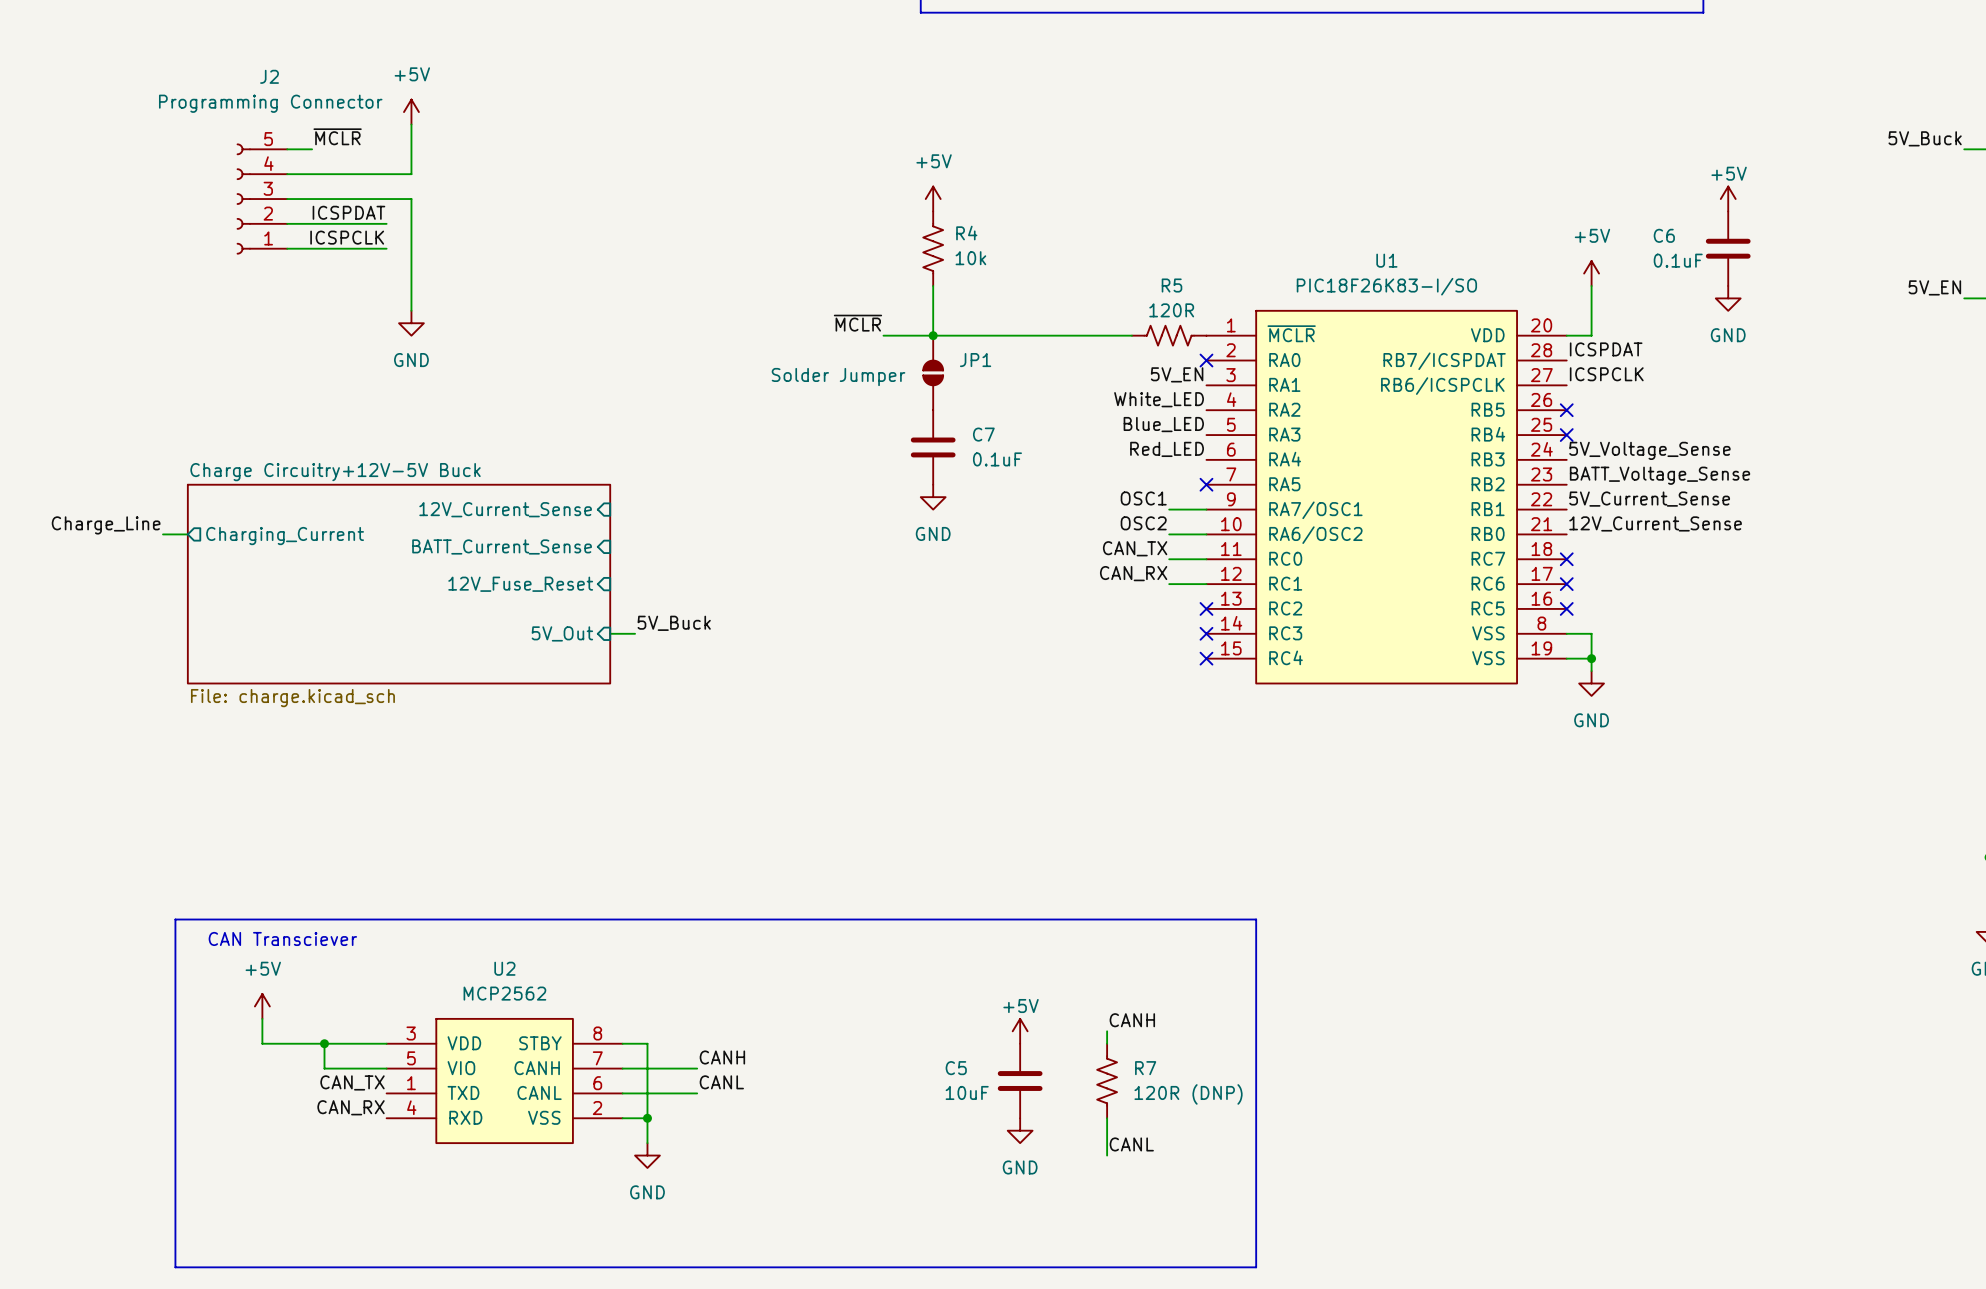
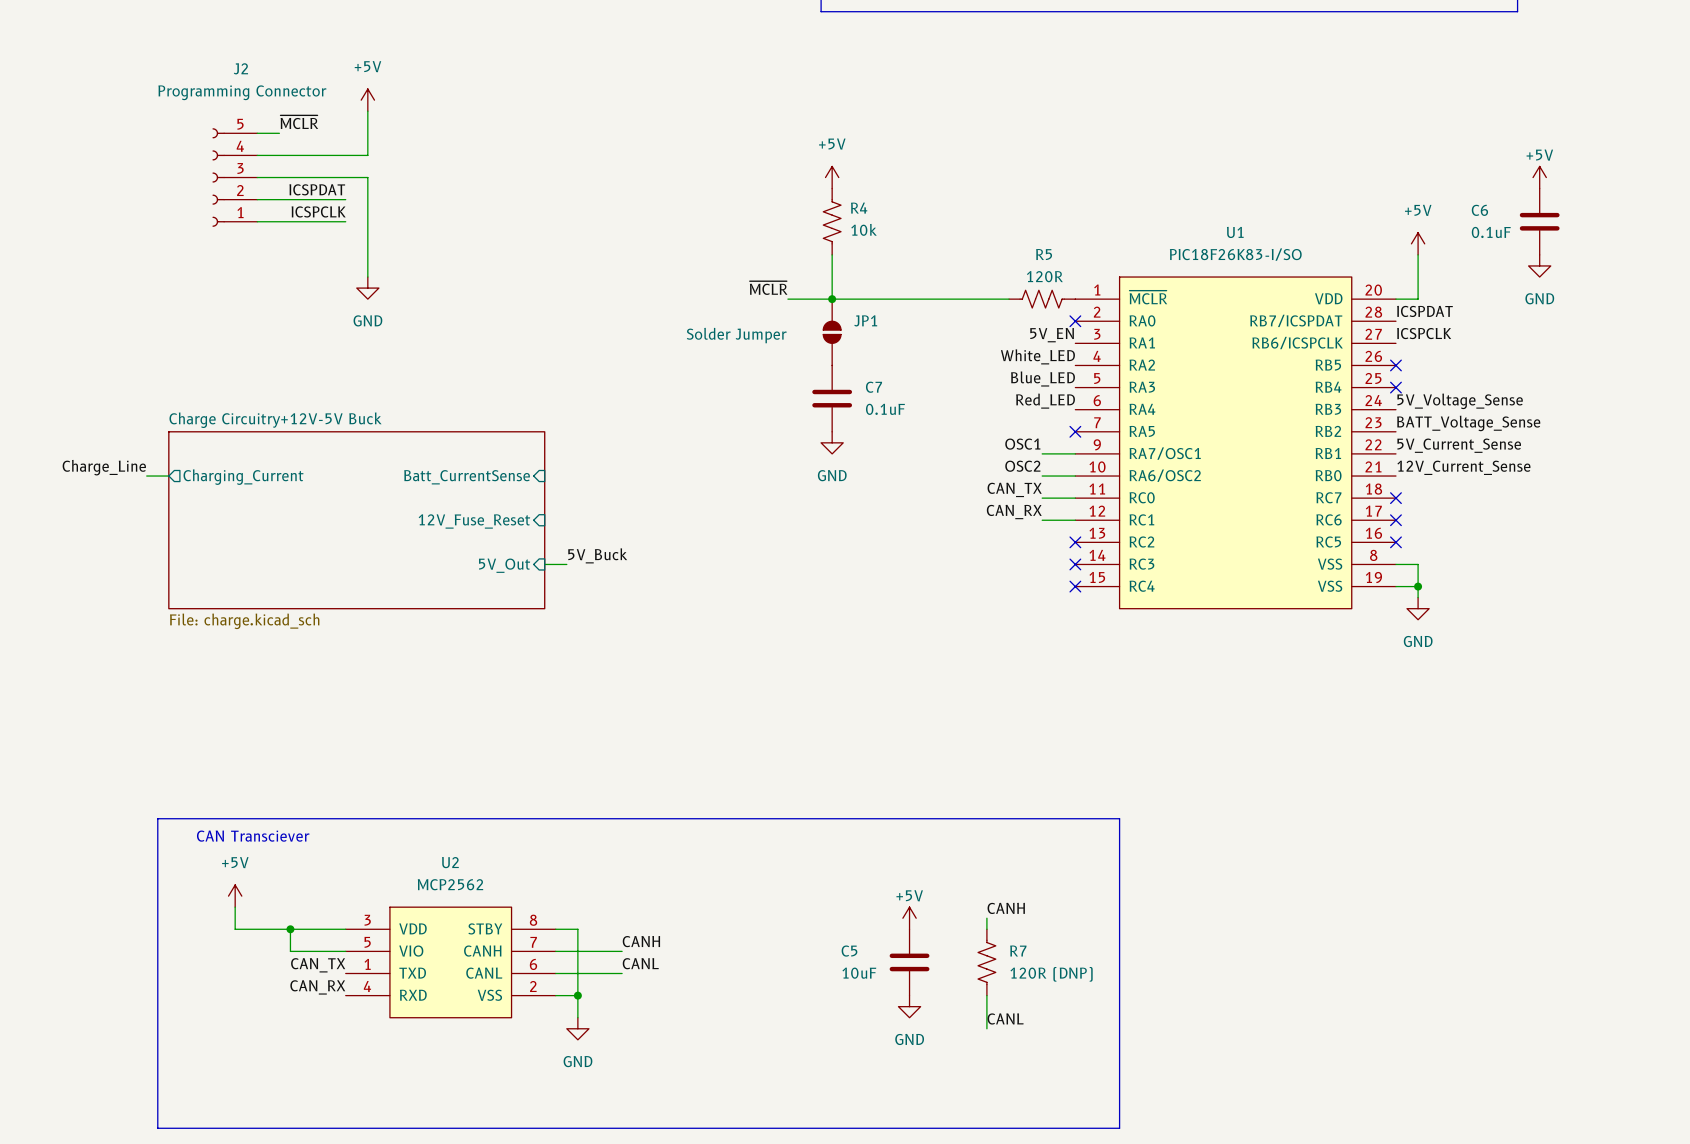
sheet pin: 12V_Current_Sense (505, 509) -> none
sheet pin: none -> Batt_CurrentSense (467, 477)
sheet pin: BATT_Current_Sense (502, 546) -> none

